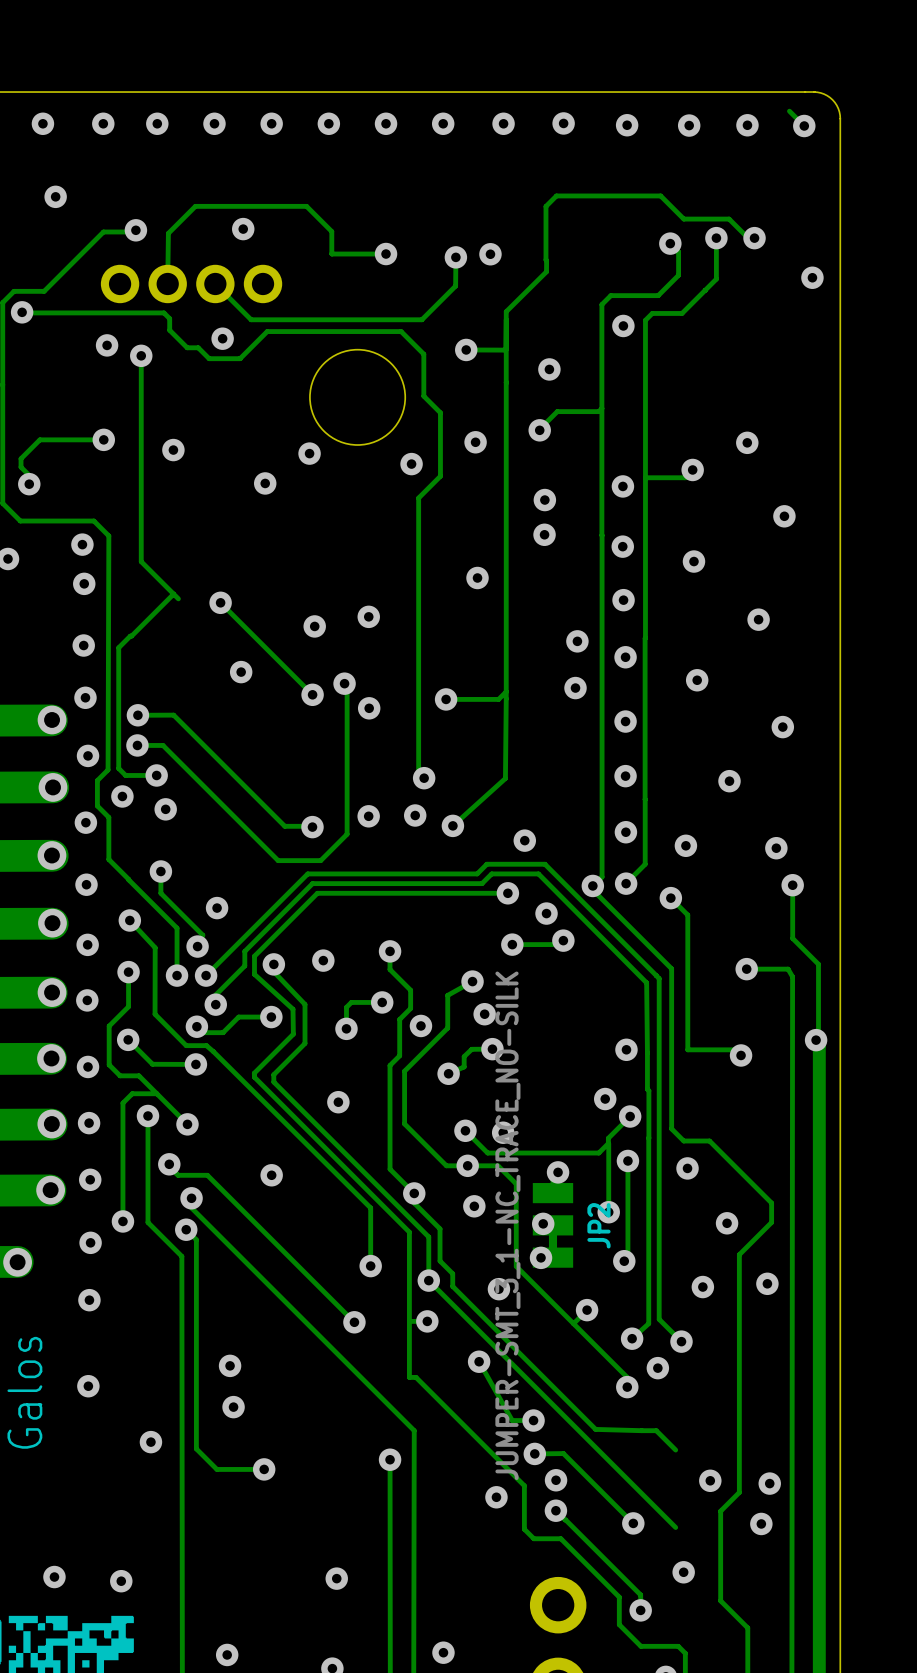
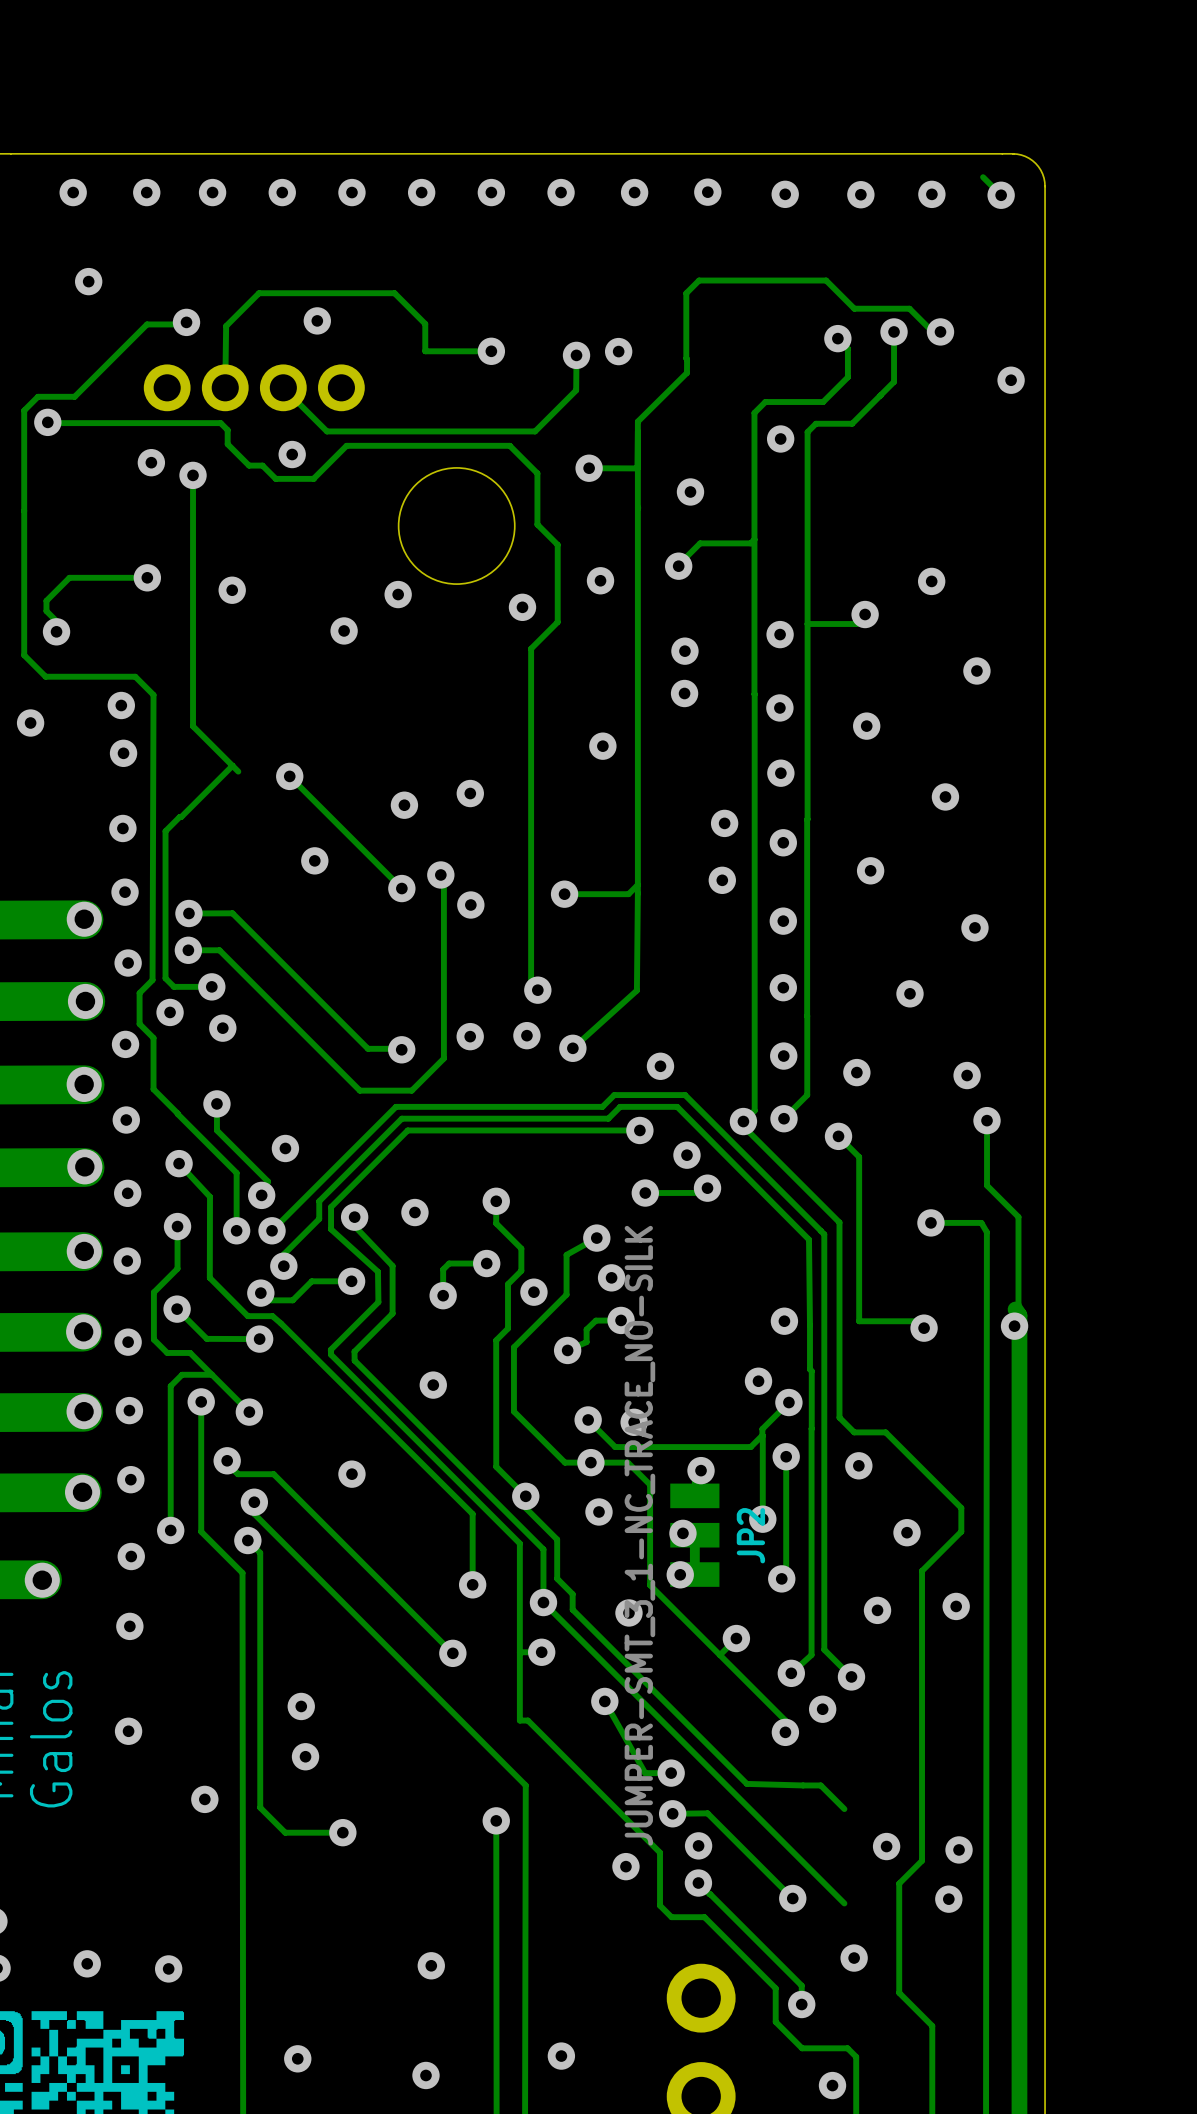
via position: (816, 1040) -> (1014, 1326)

